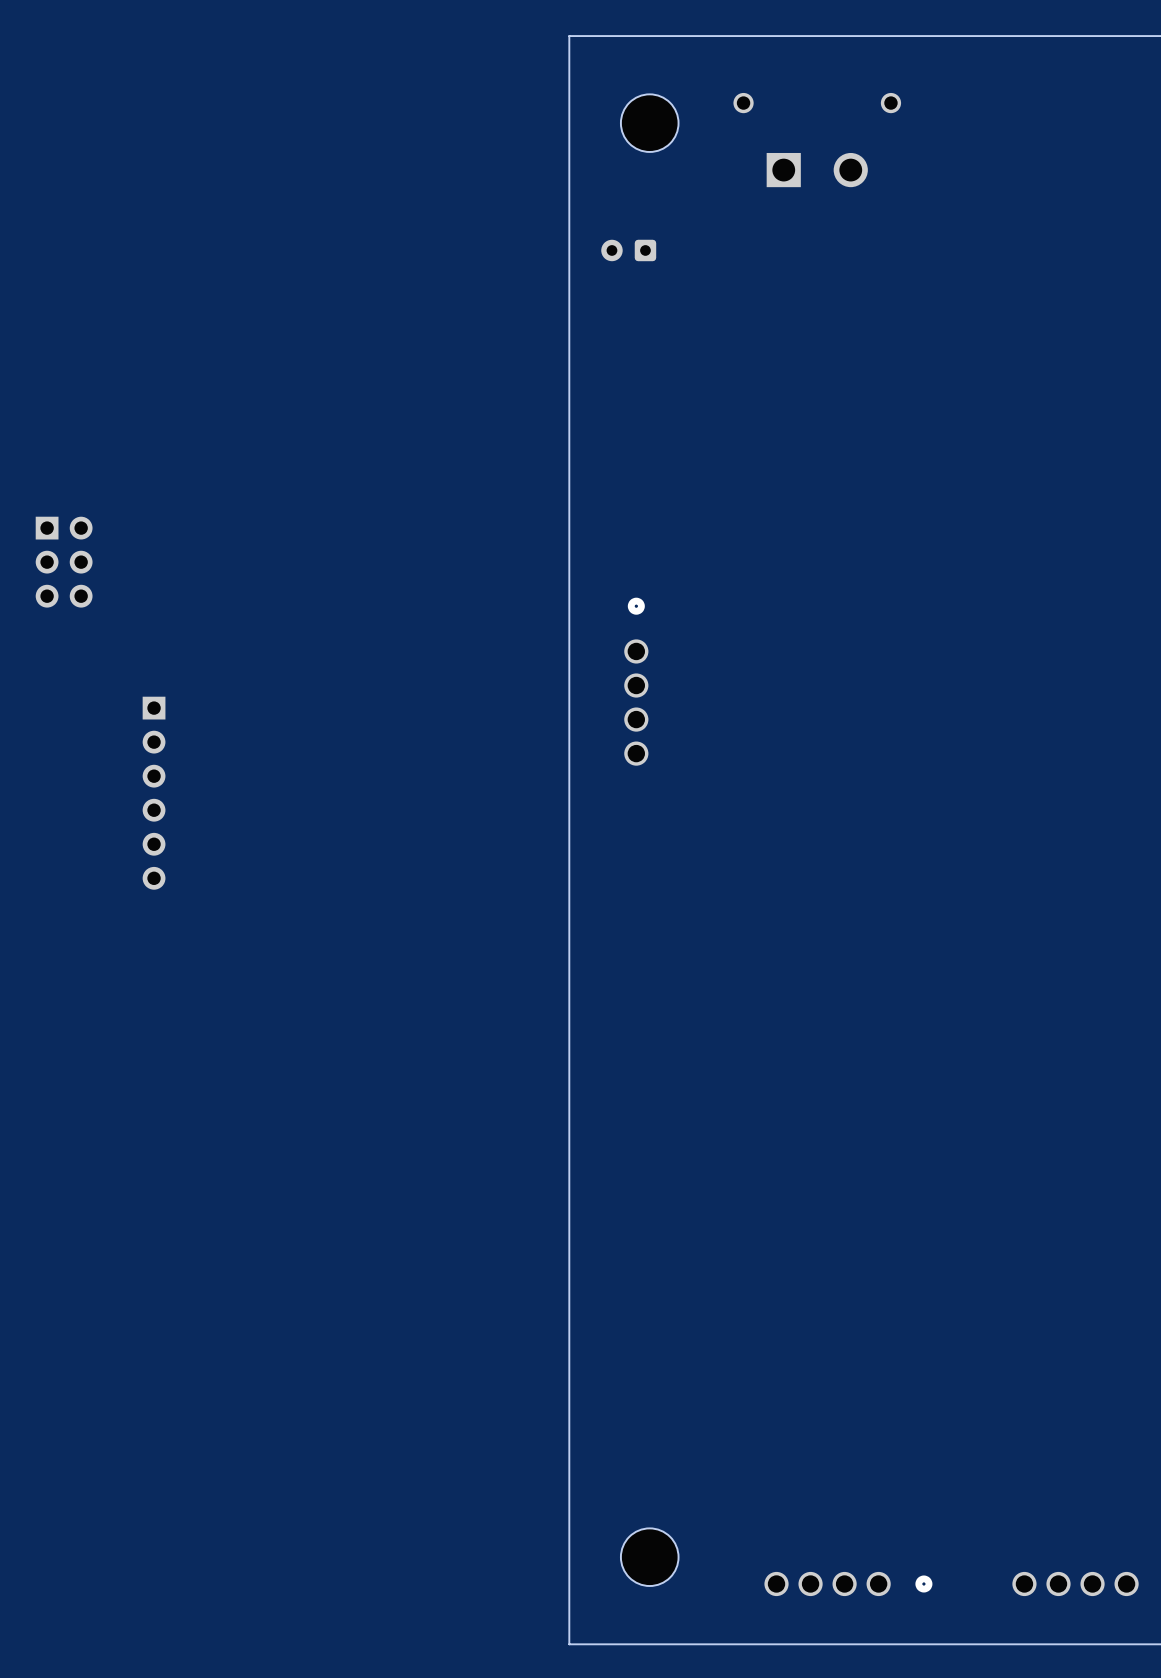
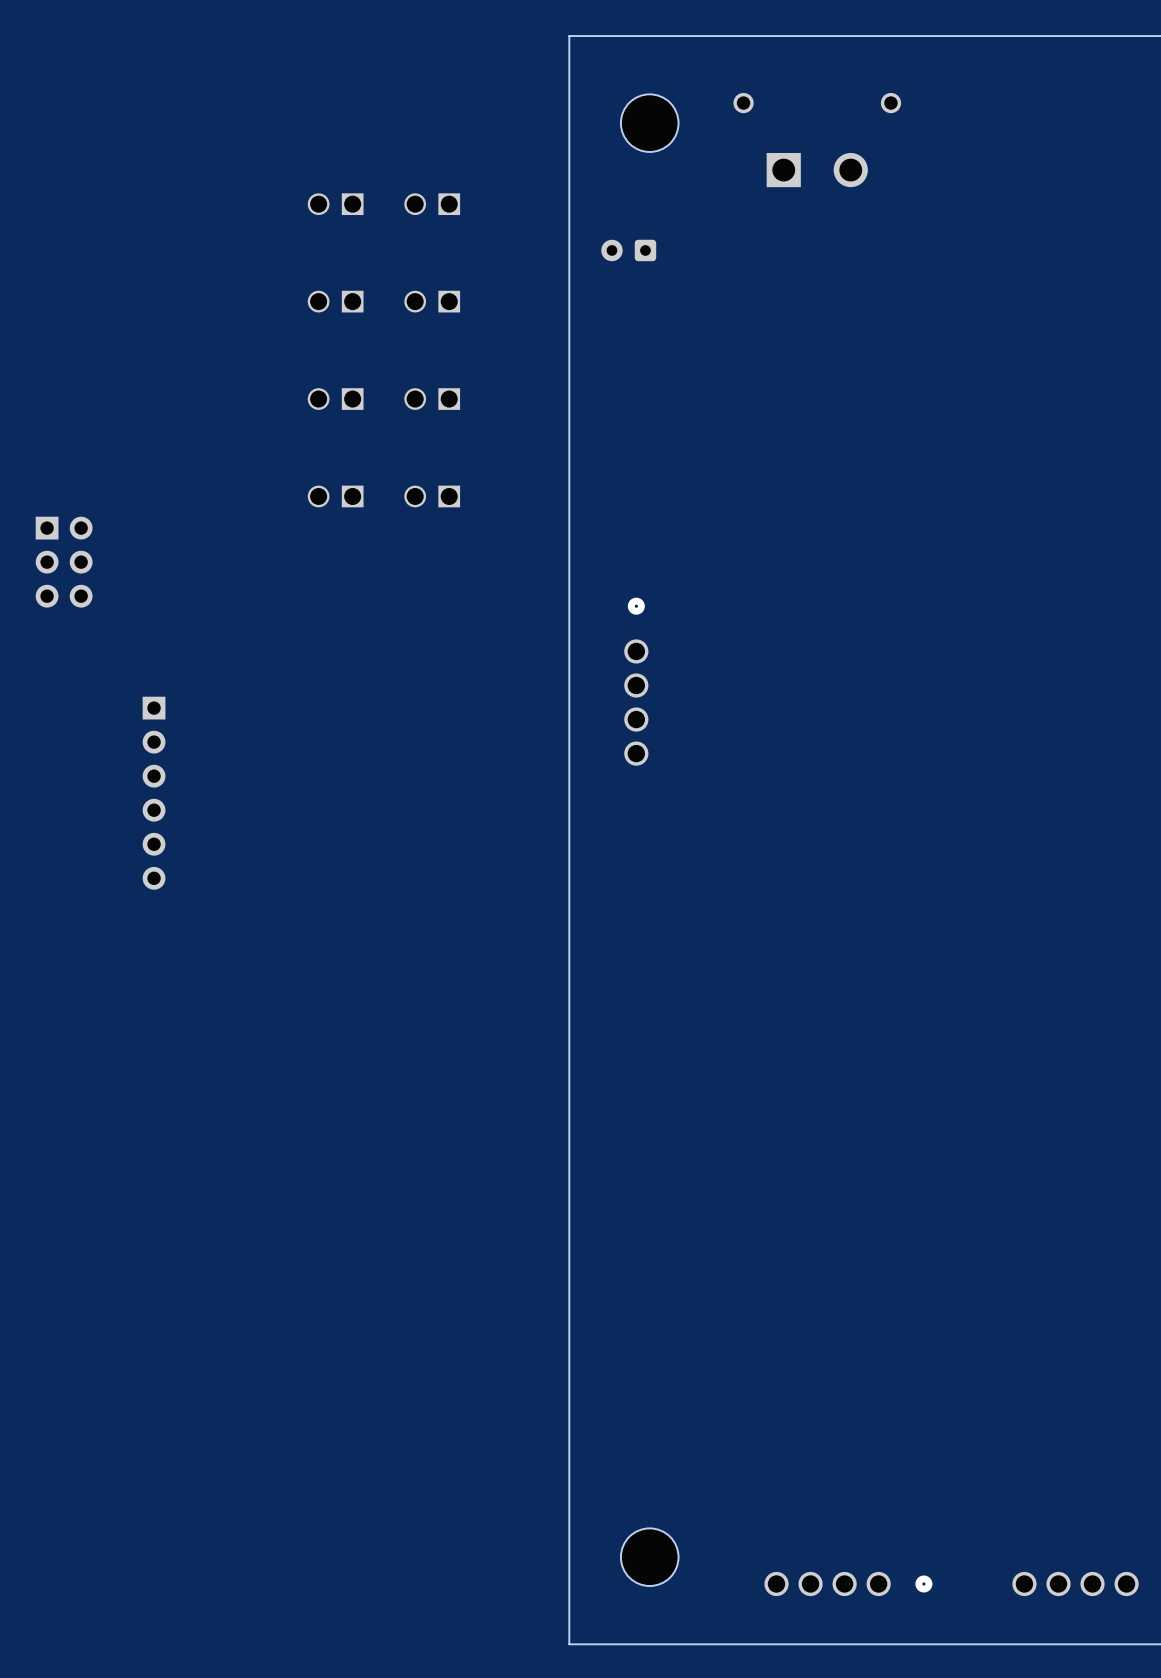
part: none -> (335, 204)
part: none -> (432, 204)
part: none -> (335, 301)
part: none -> (432, 301)
part: none -> (335, 399)
part: none -> (432, 399)
part: none -> (335, 496)
part: none -> (432, 496)

